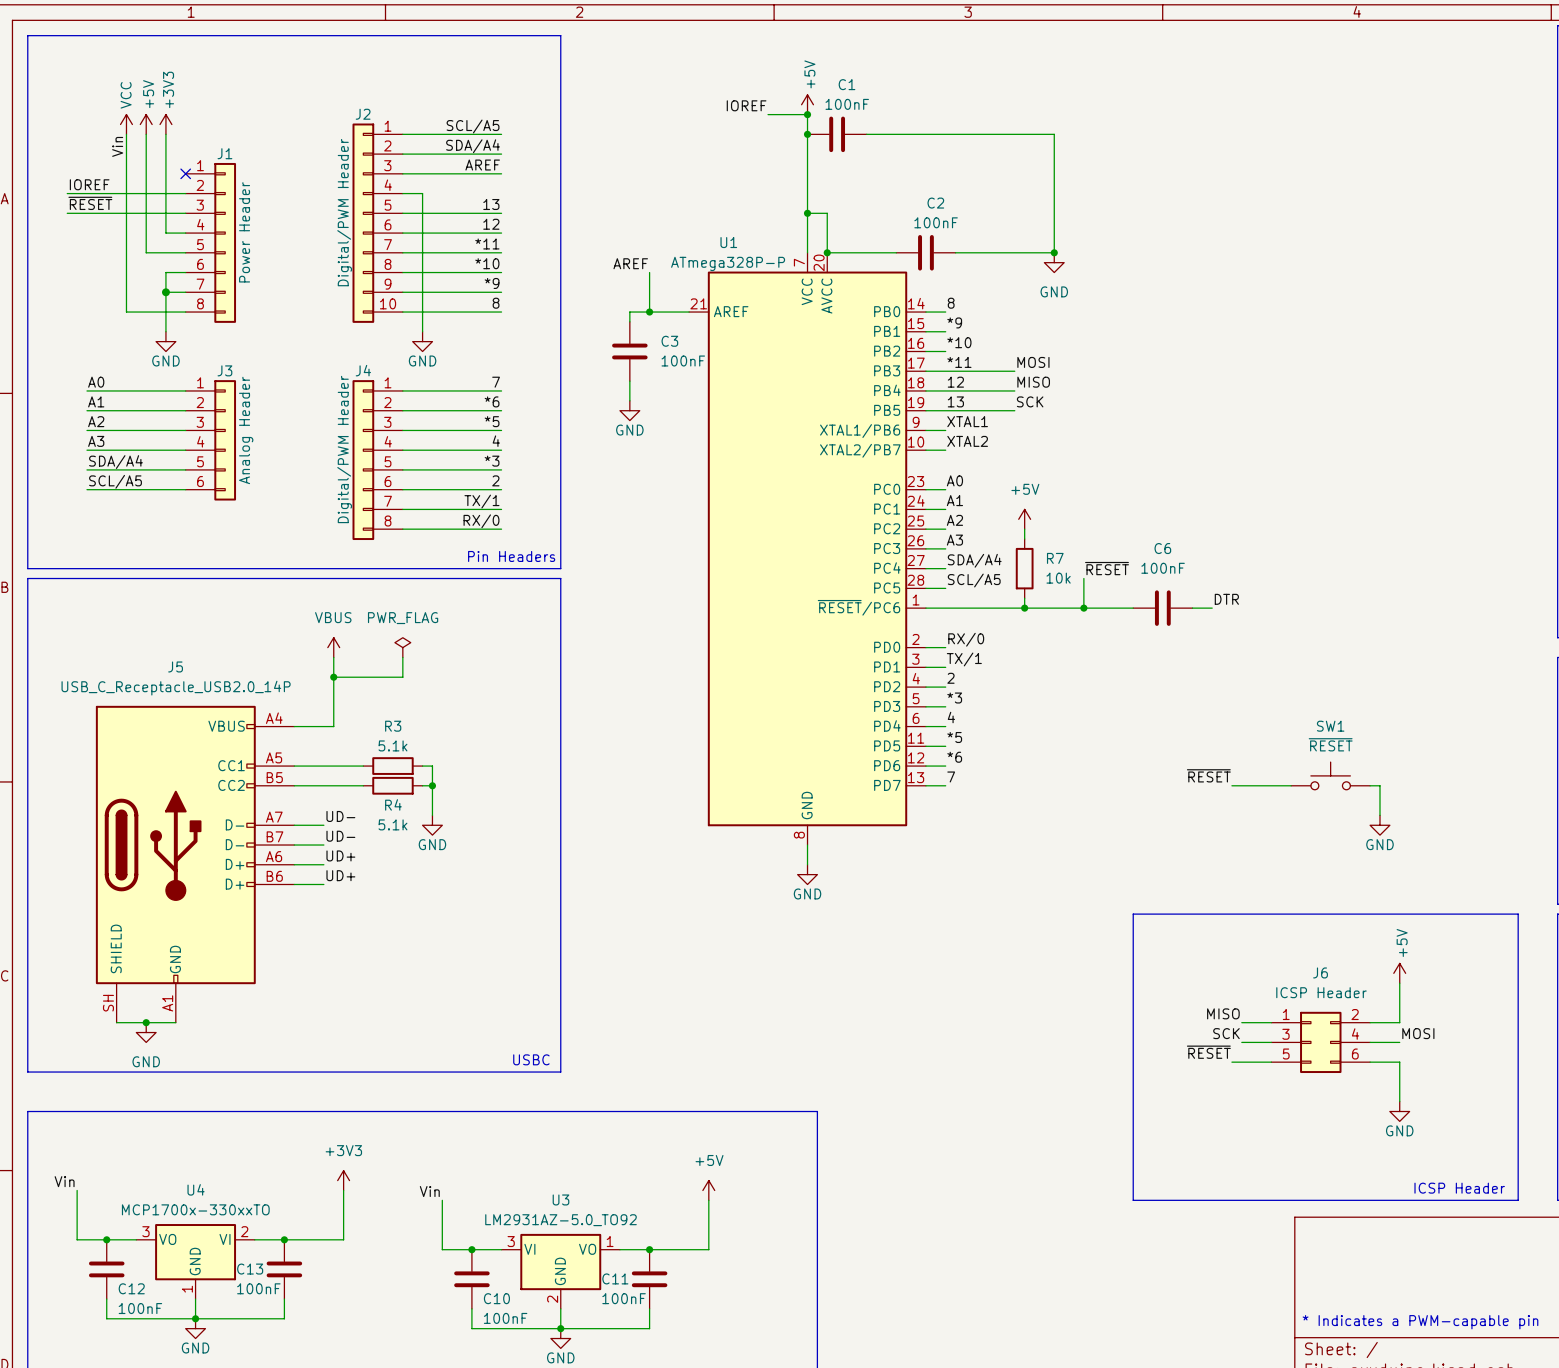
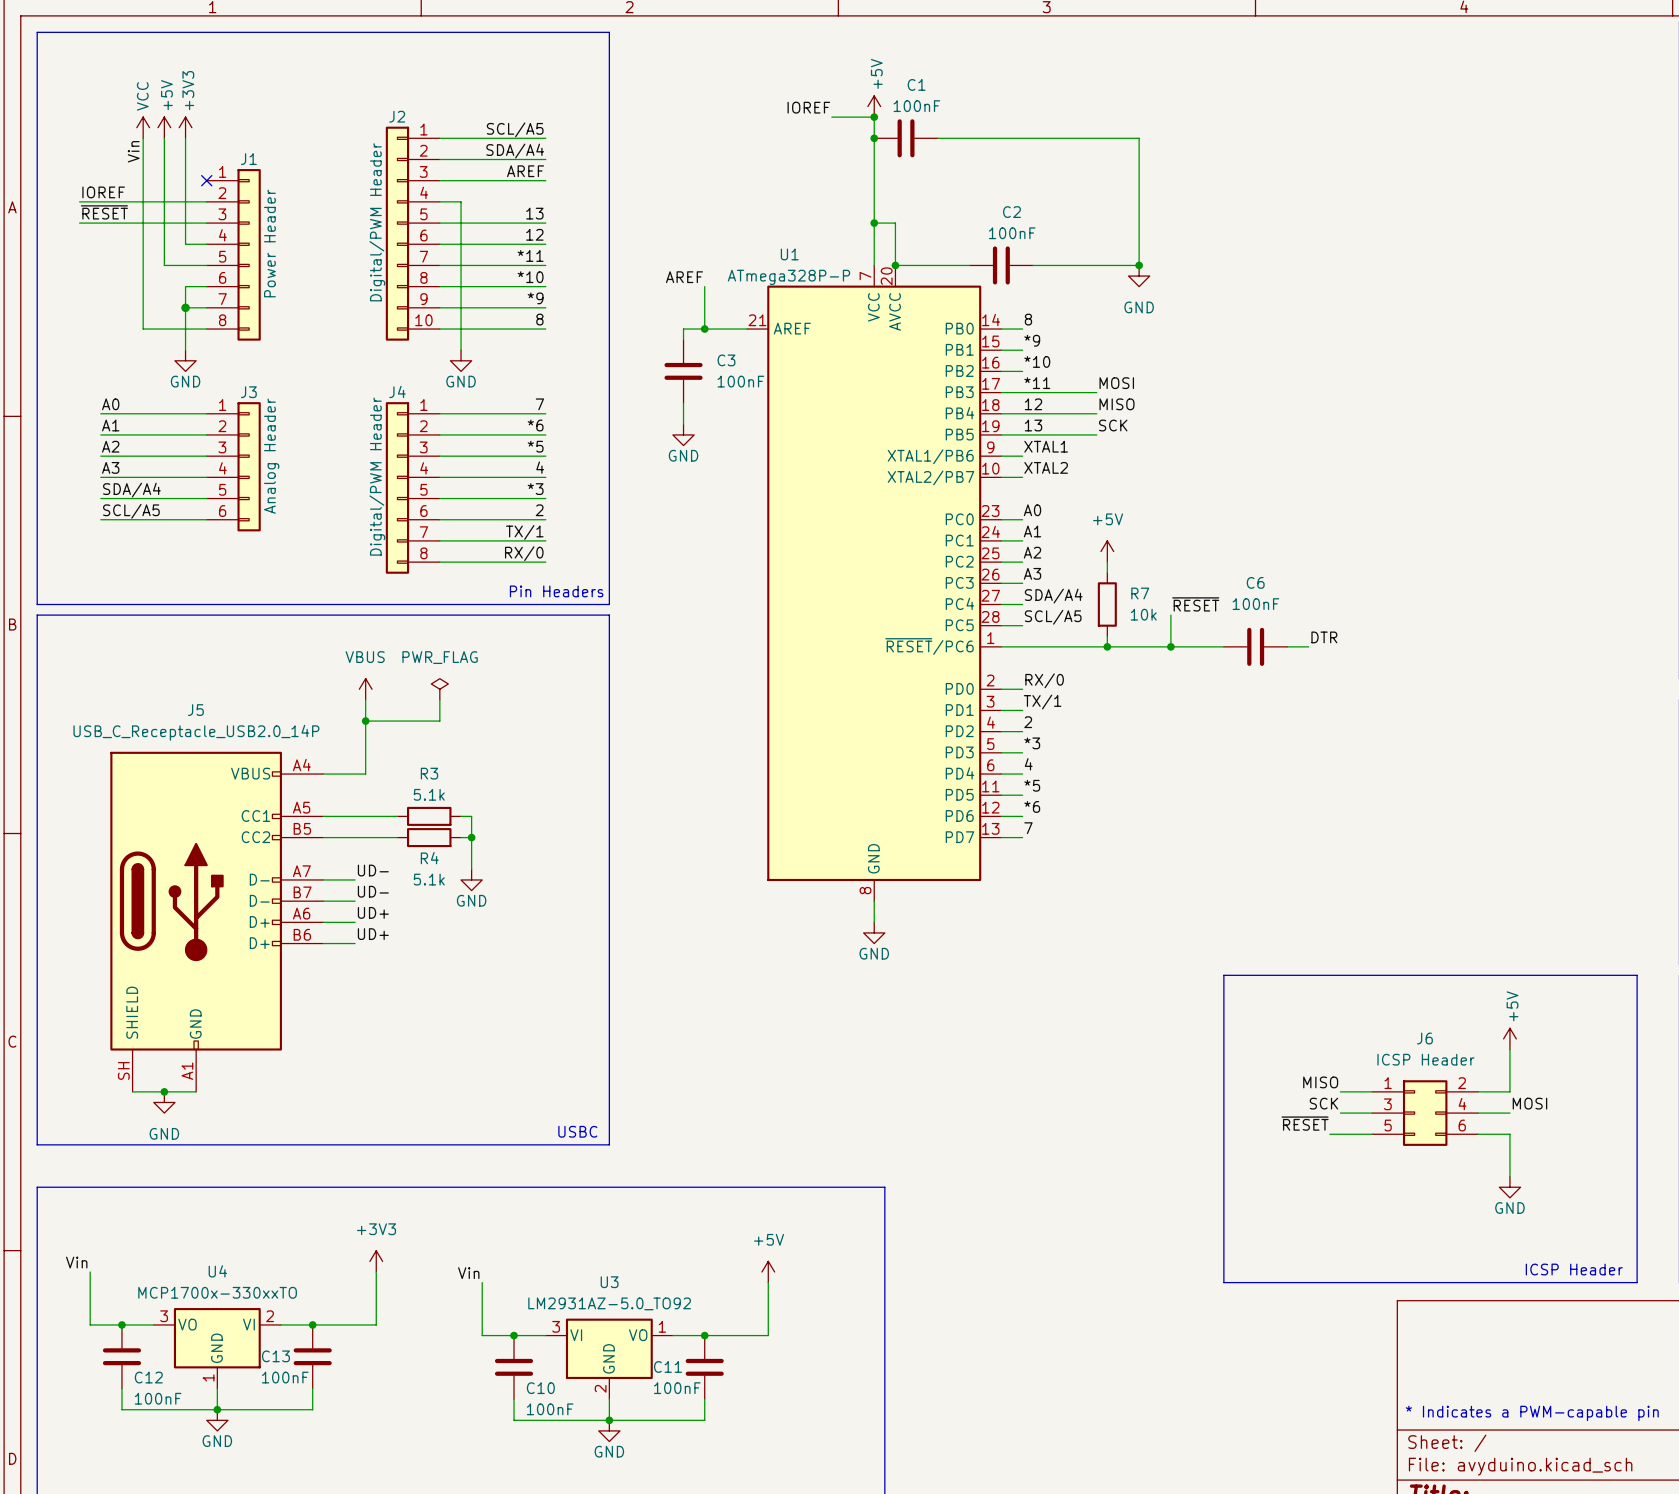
label: ~{RESET} (1208, 775) -> none
SW1: ~{RESET} (1330, 775) -> none
wire: (1231, 785) (1291, 785) -> none
wire: (1370, 785) (1379, 785) (1379, 815) -> none
power symbol: GND (1379, 825) -> none

